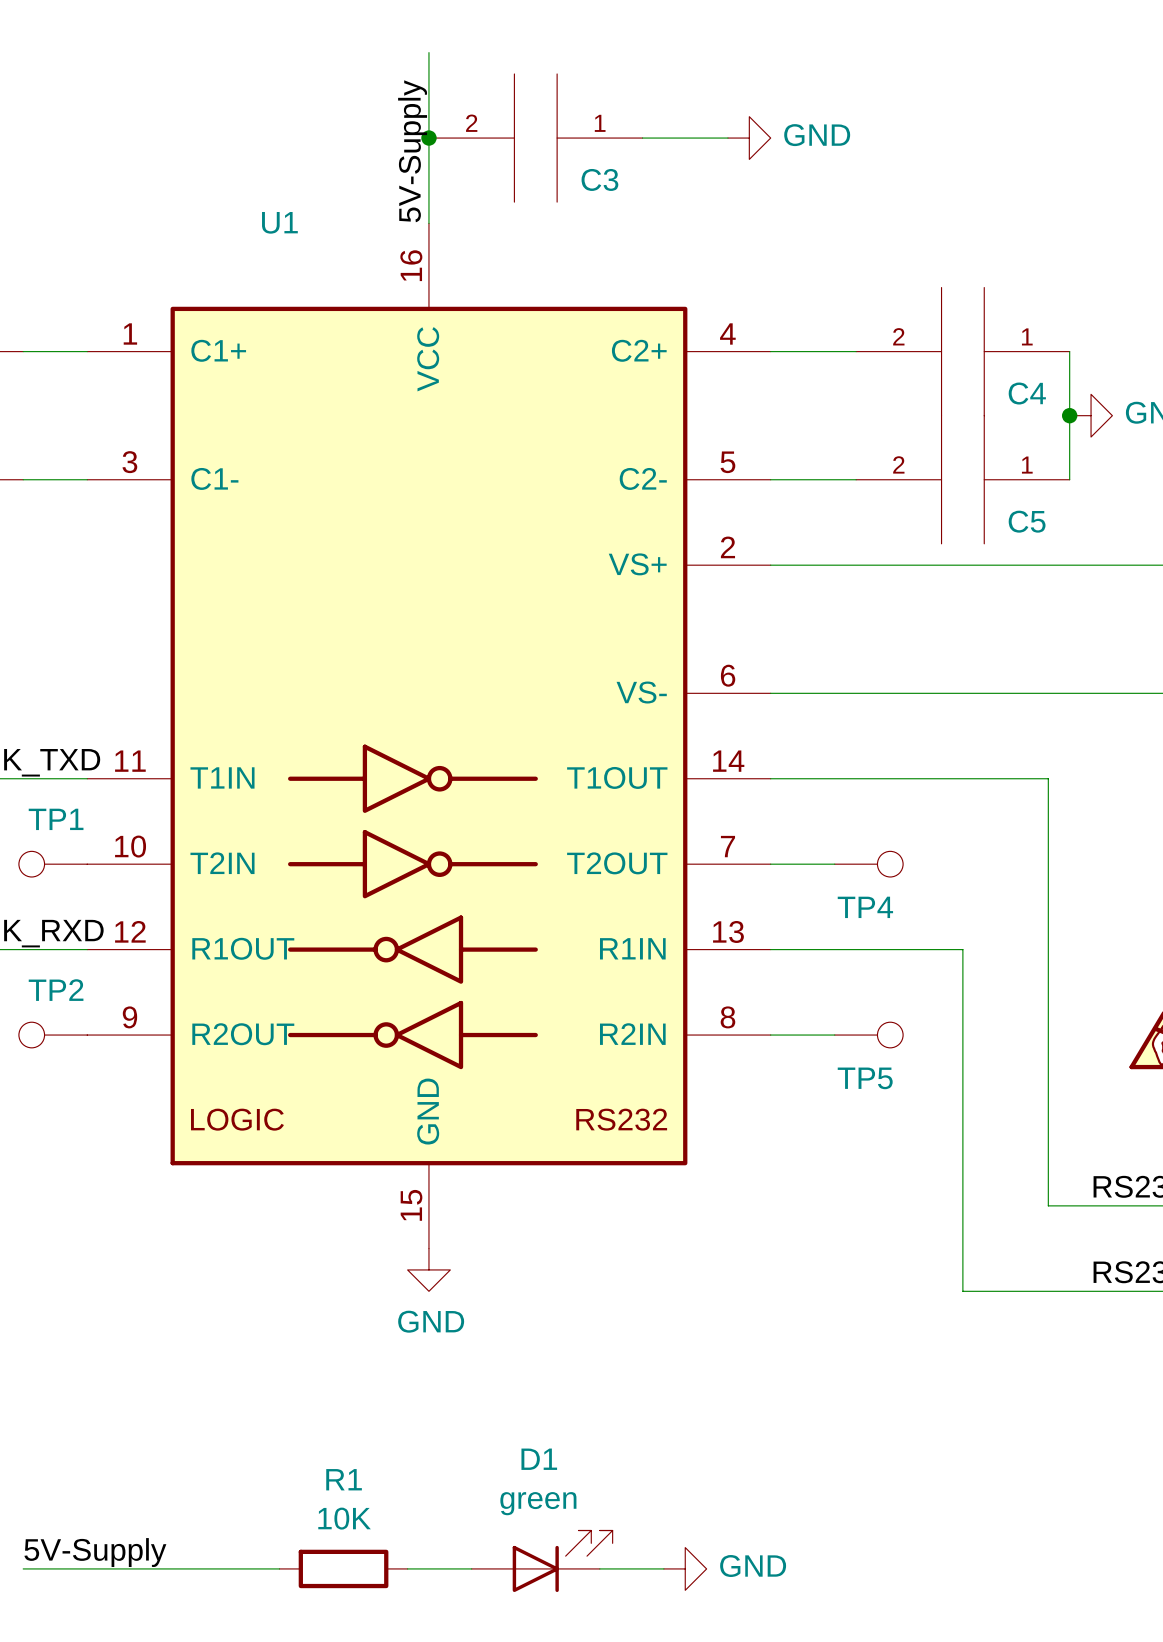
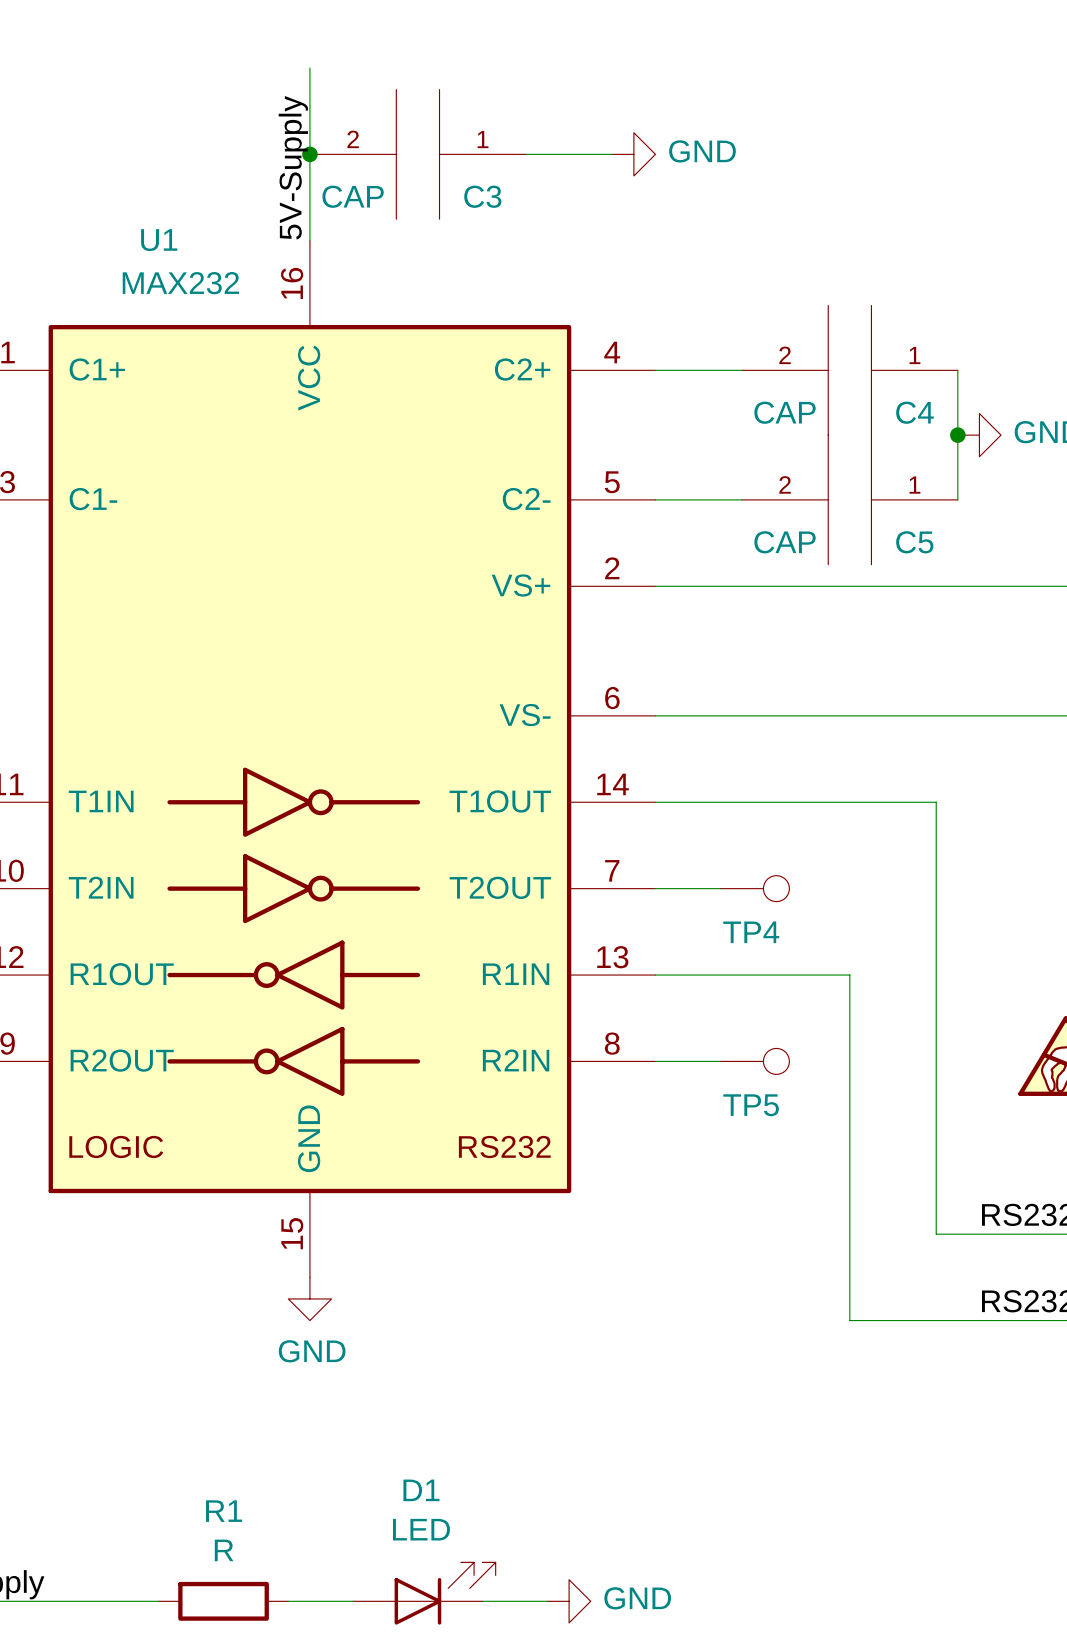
C3 value: none -> CAP (353, 196)
U1 value: none -> MAX232 (180, 283)
C4 value: none -> CAP (785, 412)
C5 value: none -> CAP (785, 542)
D1 value: green (538, 1503) -> LED (421, 1529)
R1 value: 10K (344, 1518) -> R (224, 1550)

